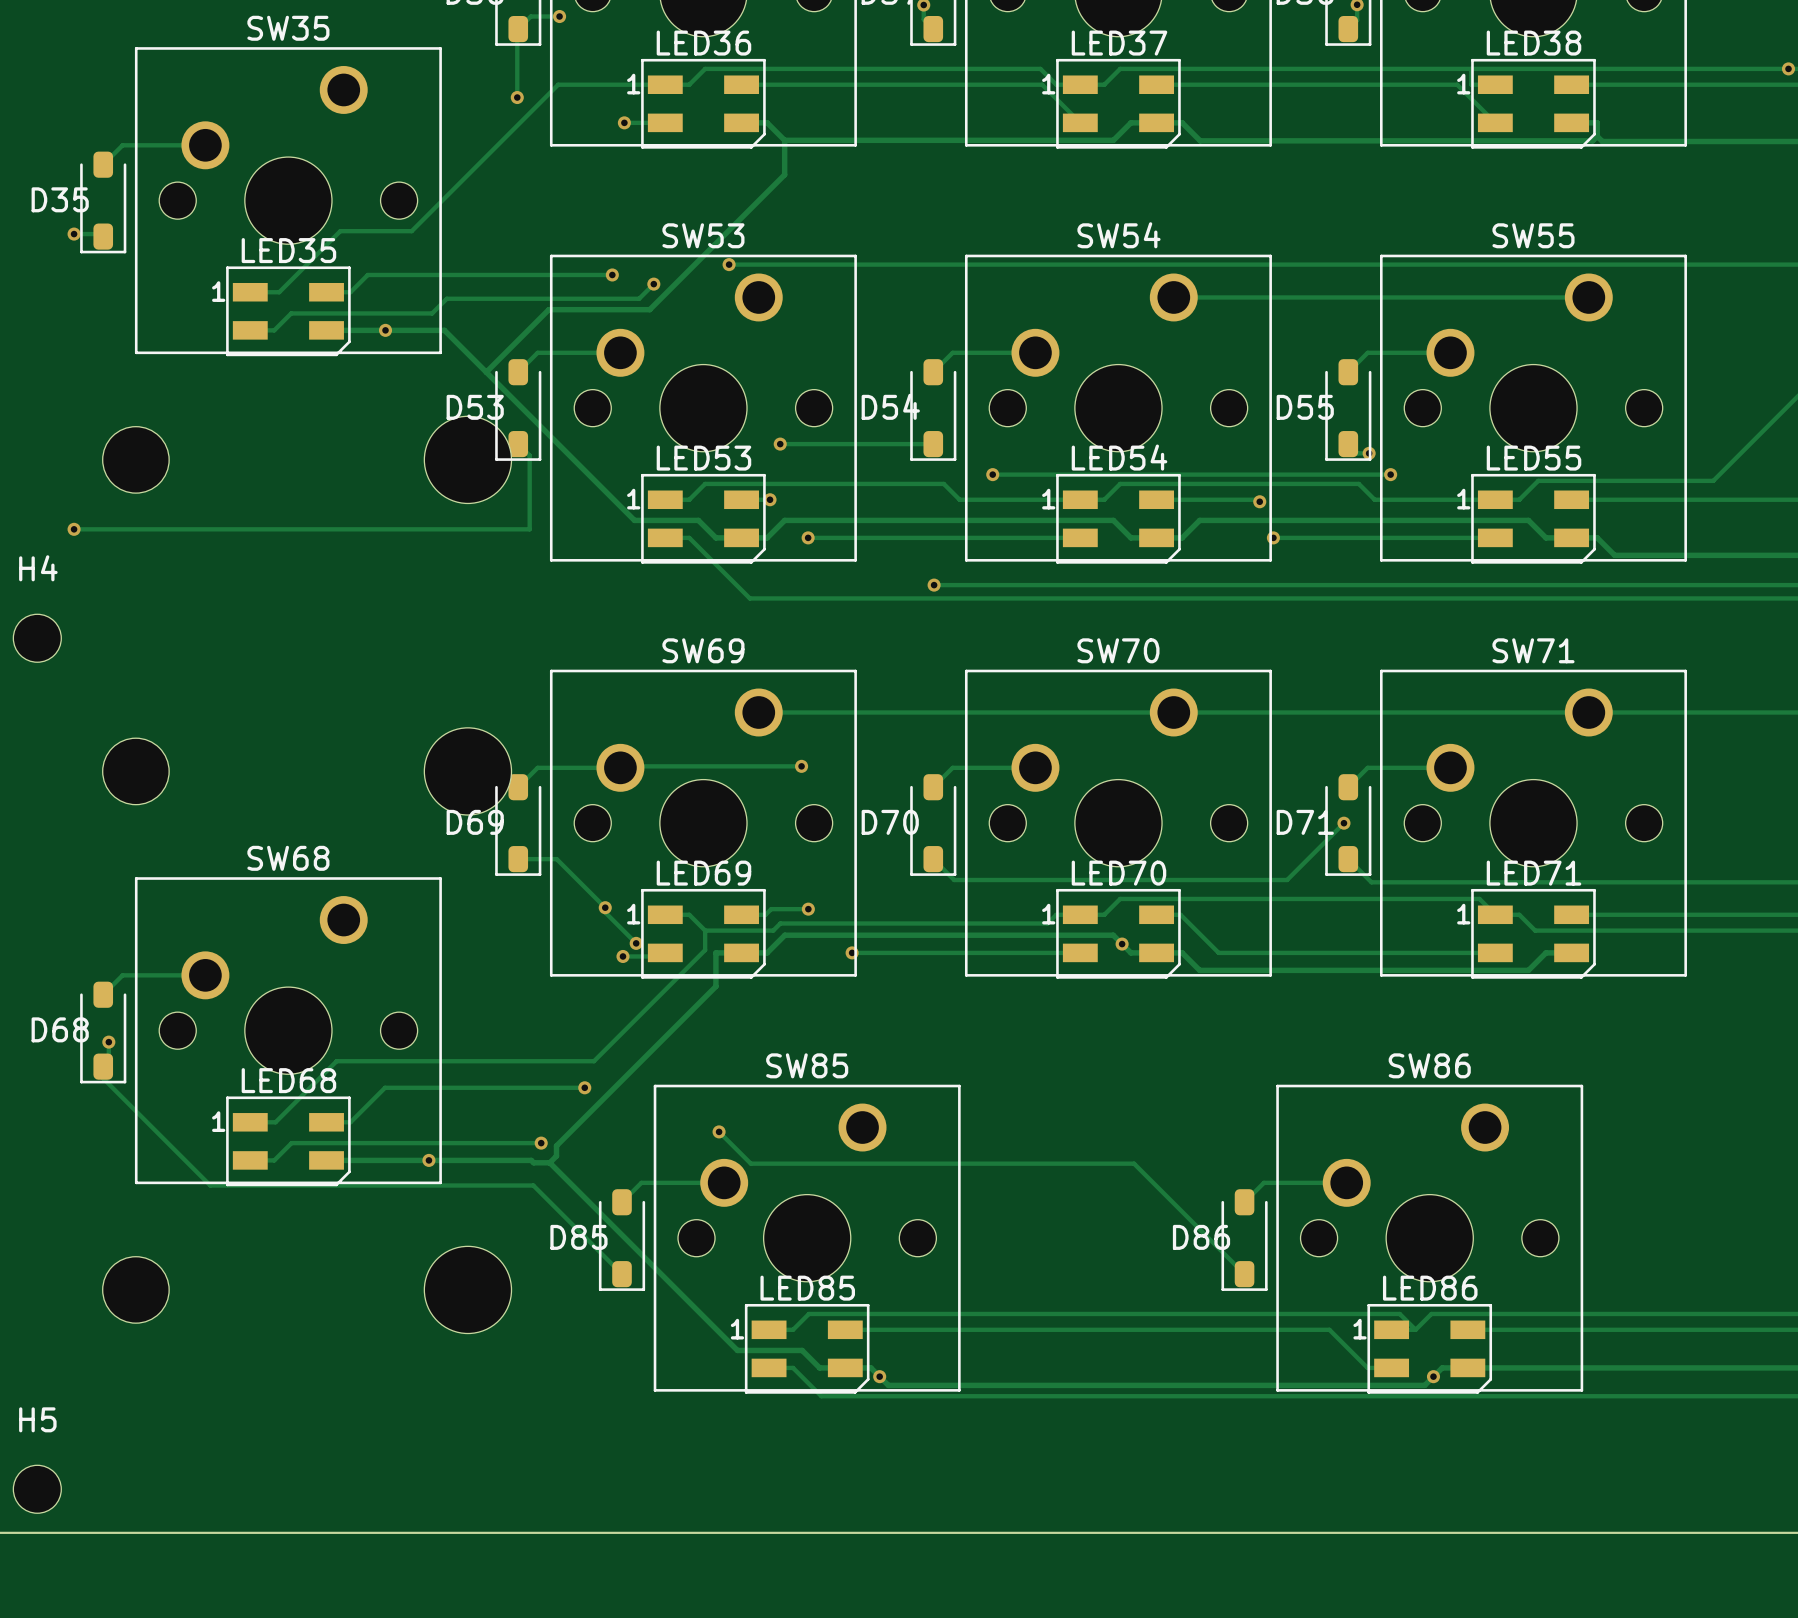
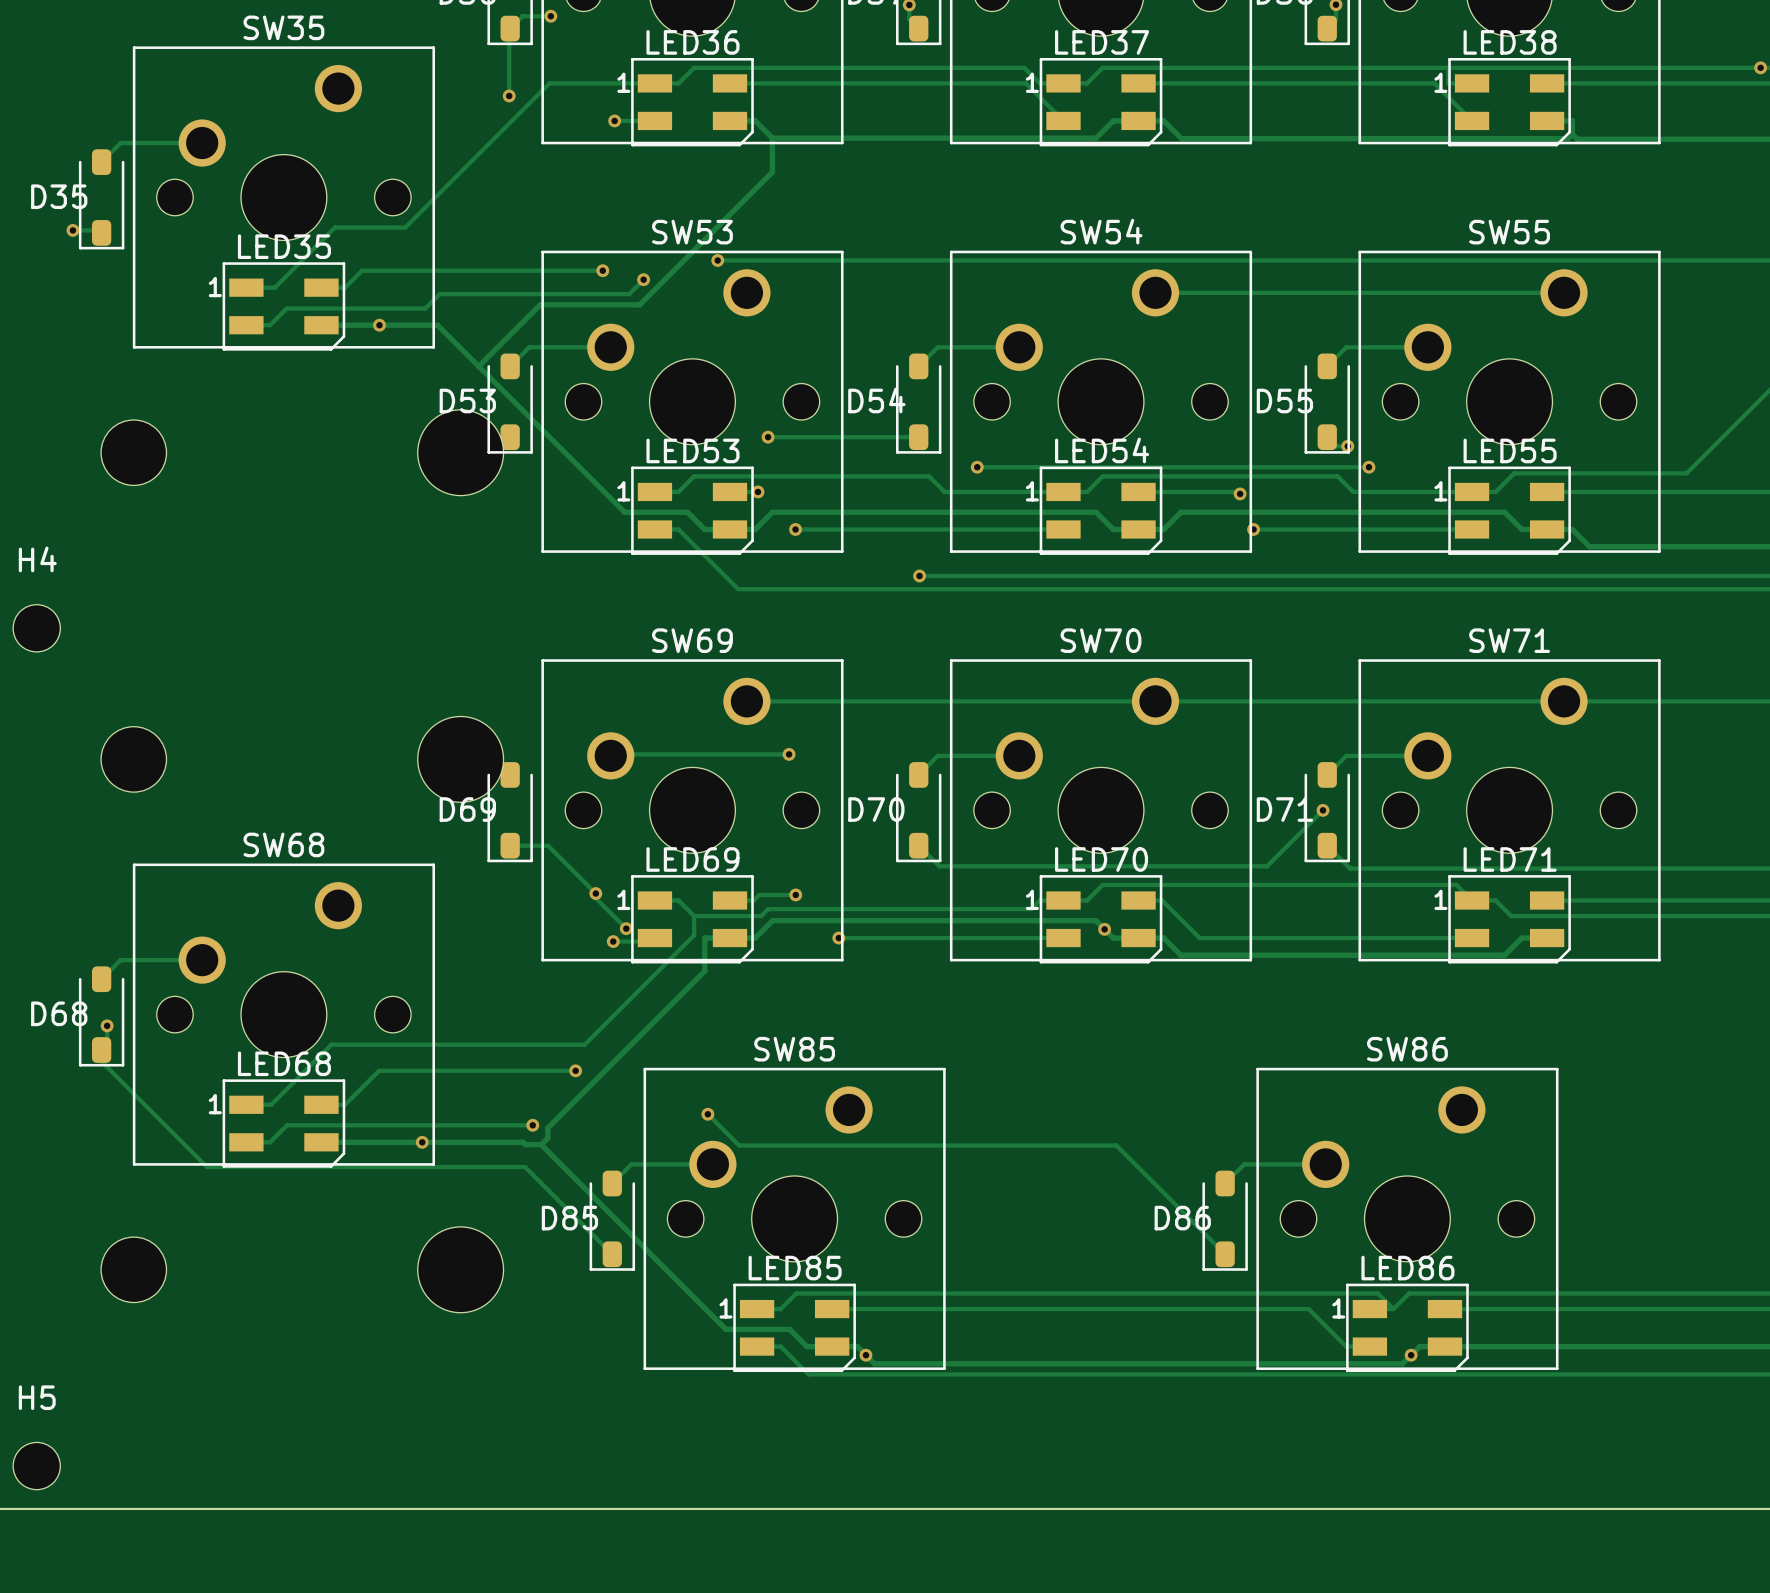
track: (518, 444) (529, 455) (529, 529) (74, 529) -> none
via: (74, 529) -> none
track: (620, 767) (537, 767) (518, 787) -> none

